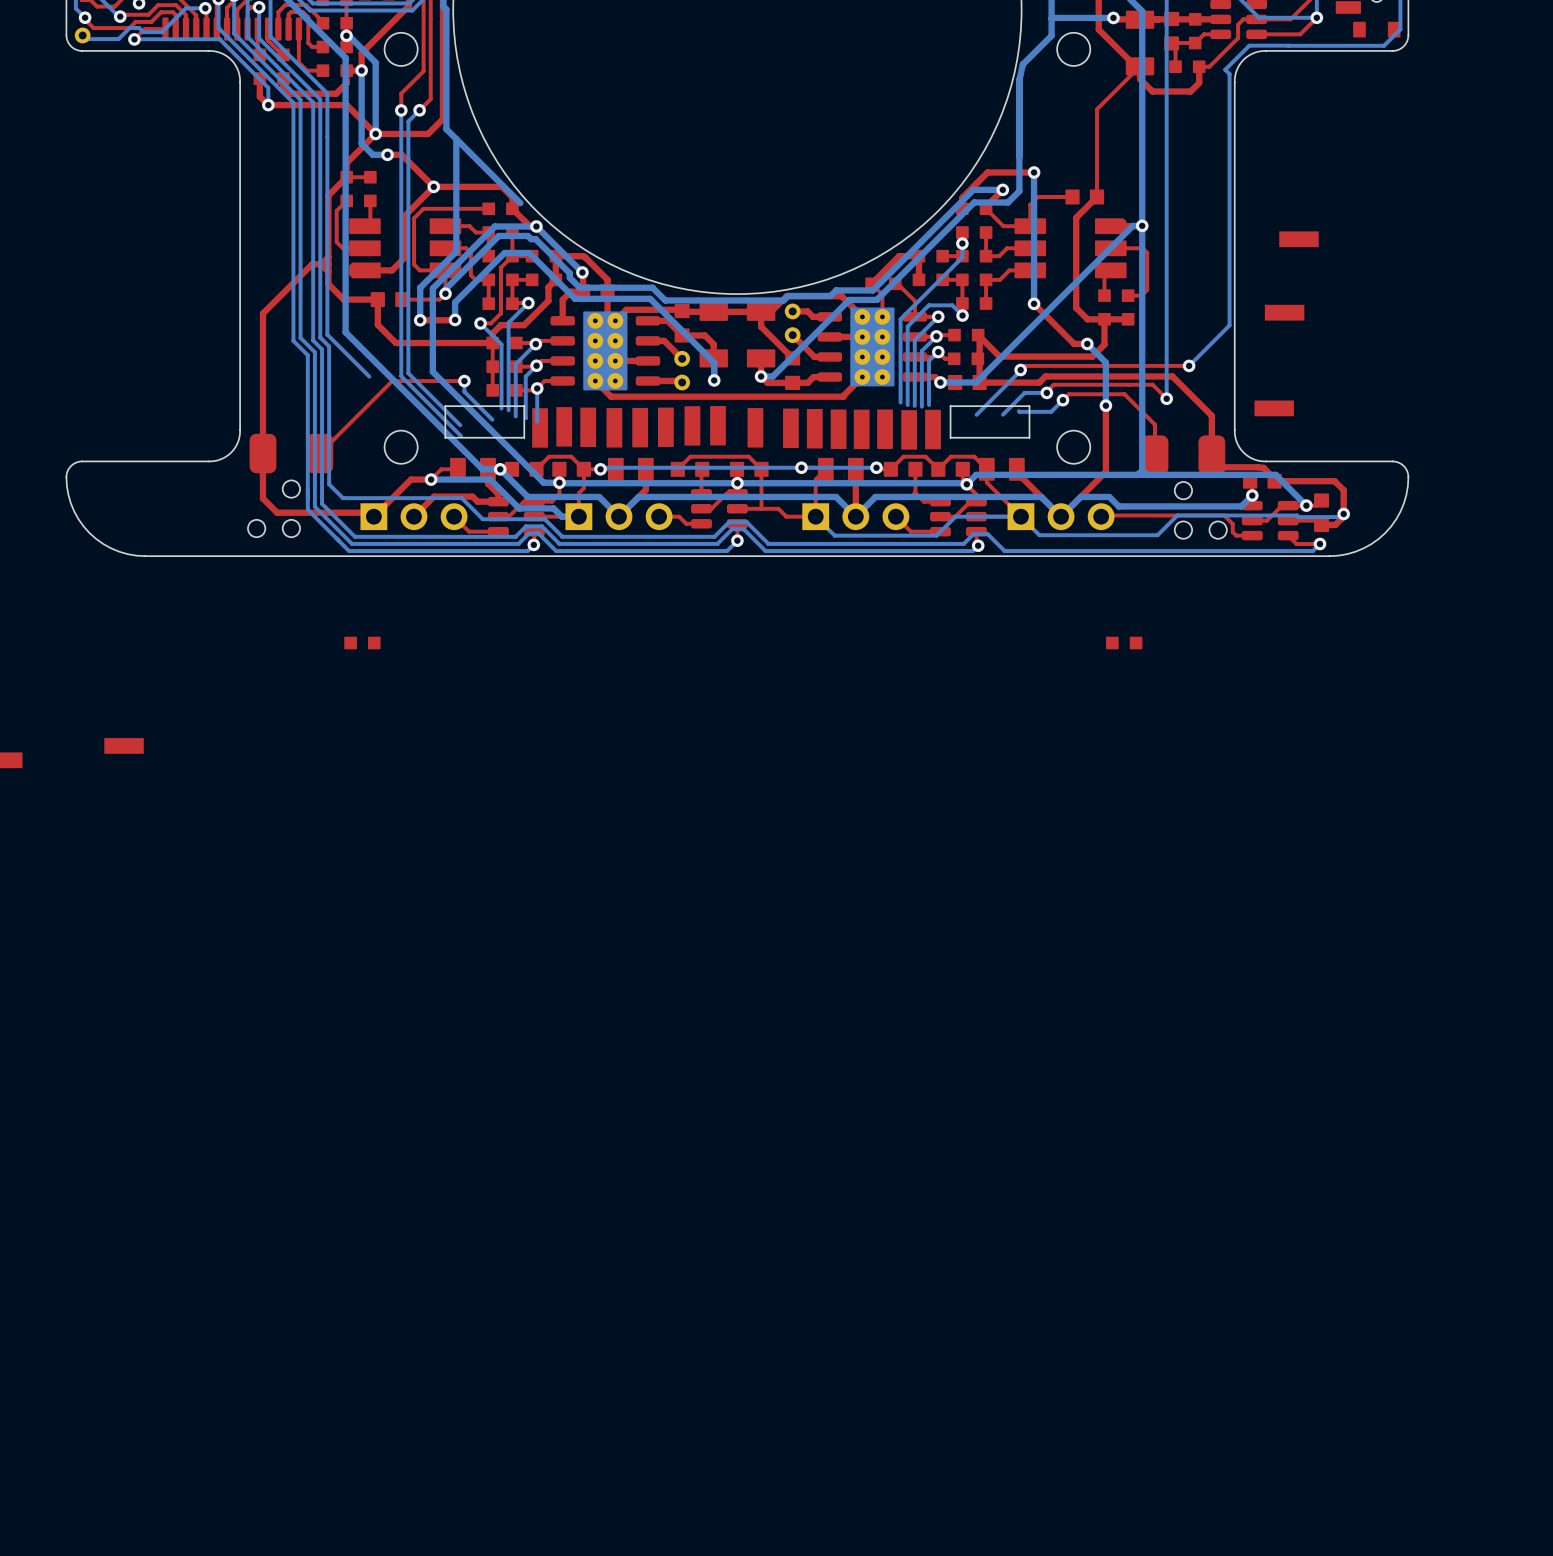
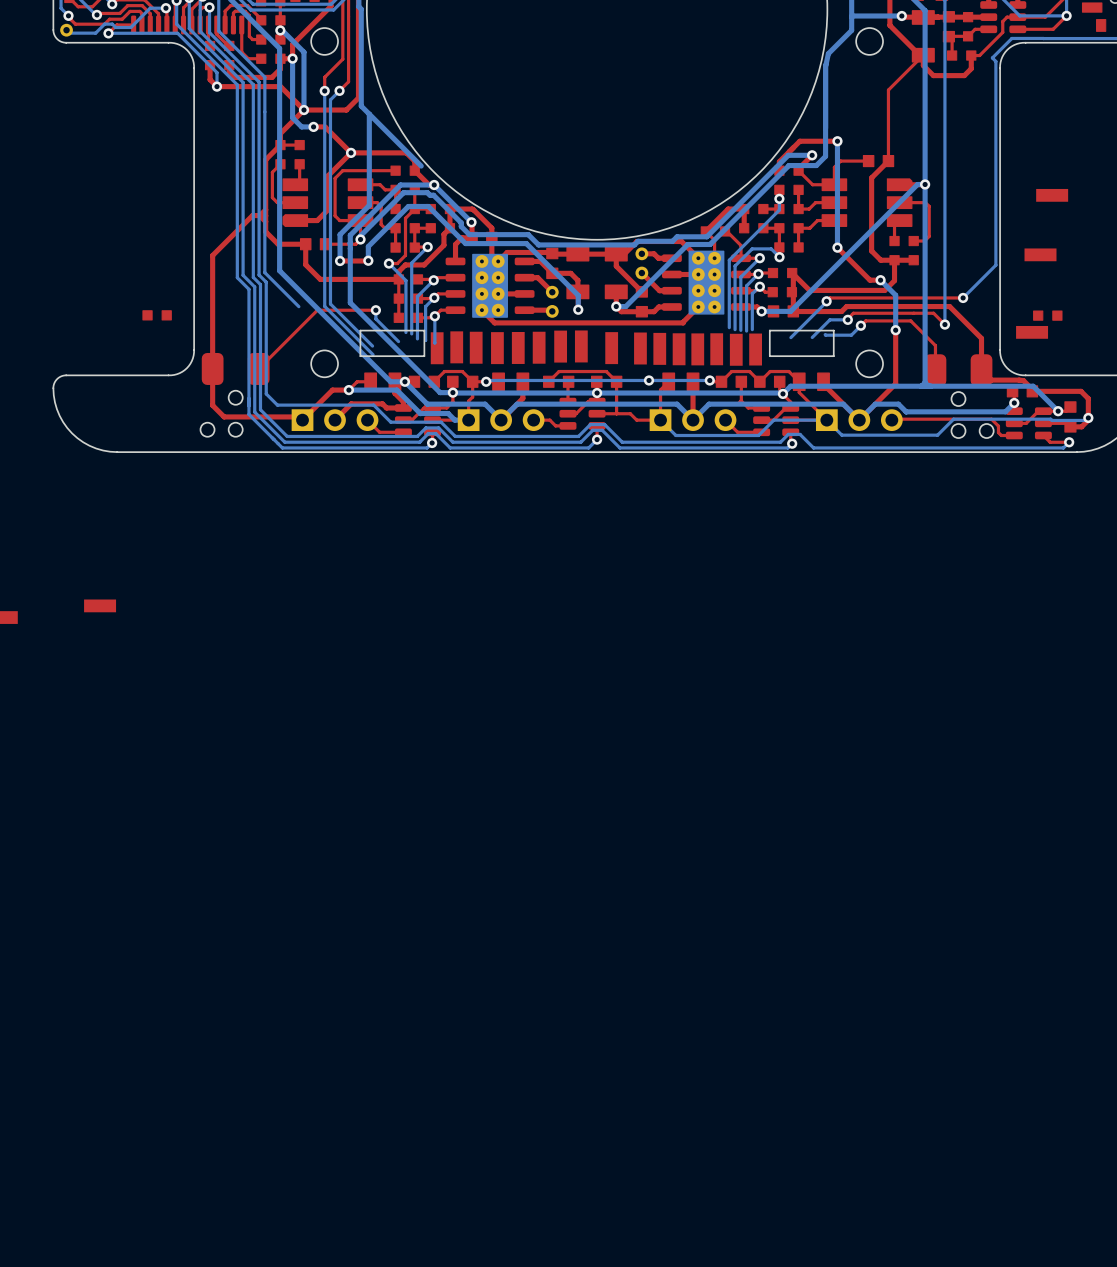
part position: (362, 642) -> (157, 315)
part position: (1124, 642) -> (1047, 315)

